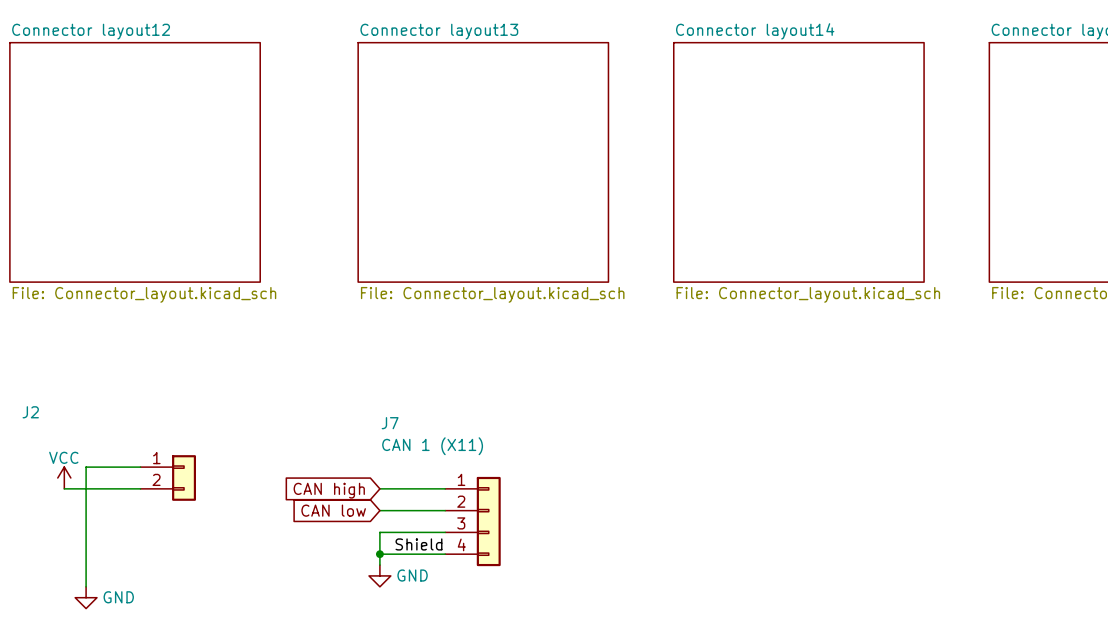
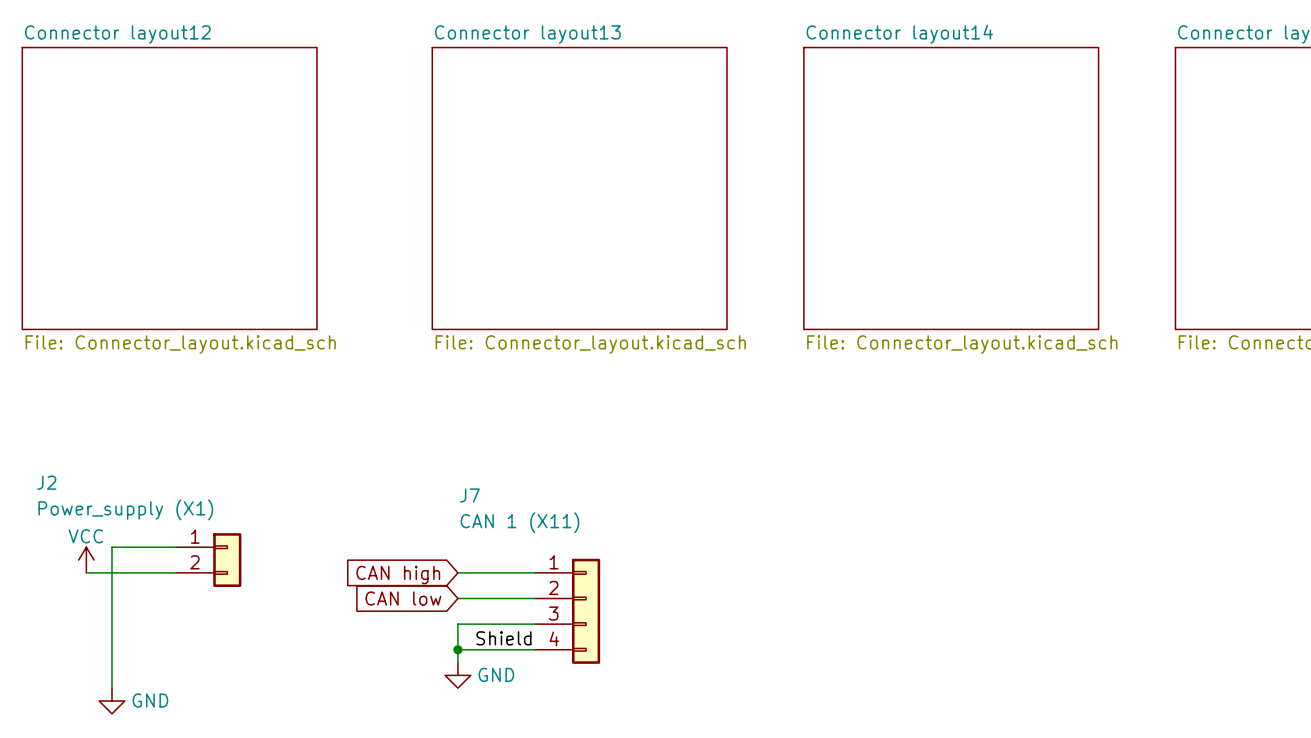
J2 value: none -> Power_supply (X1) (125, 509)

